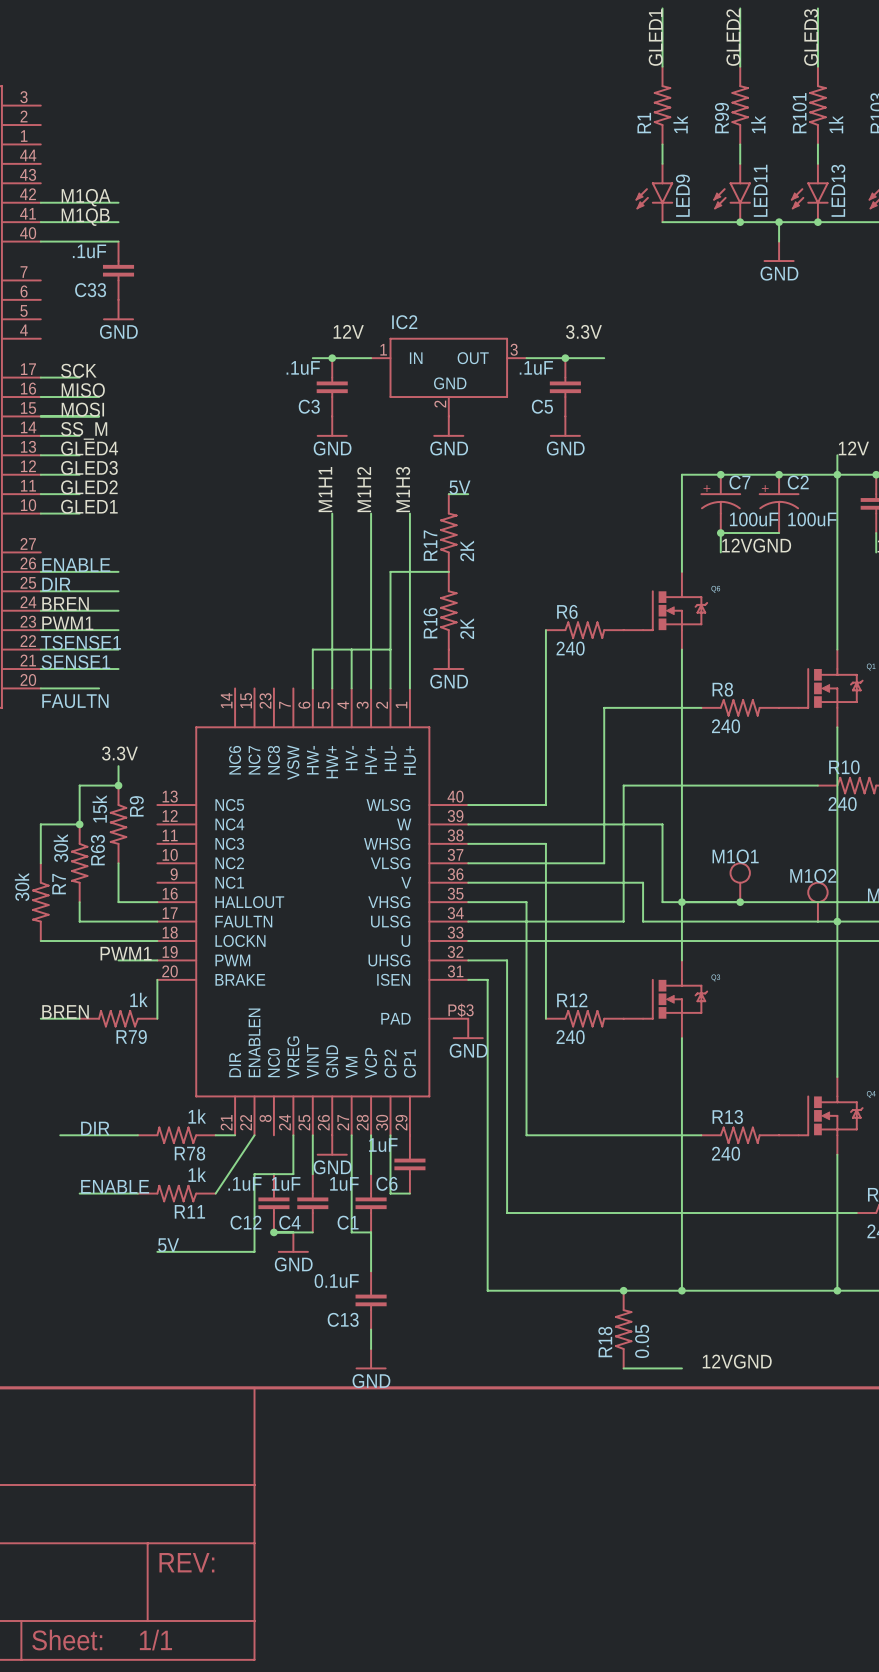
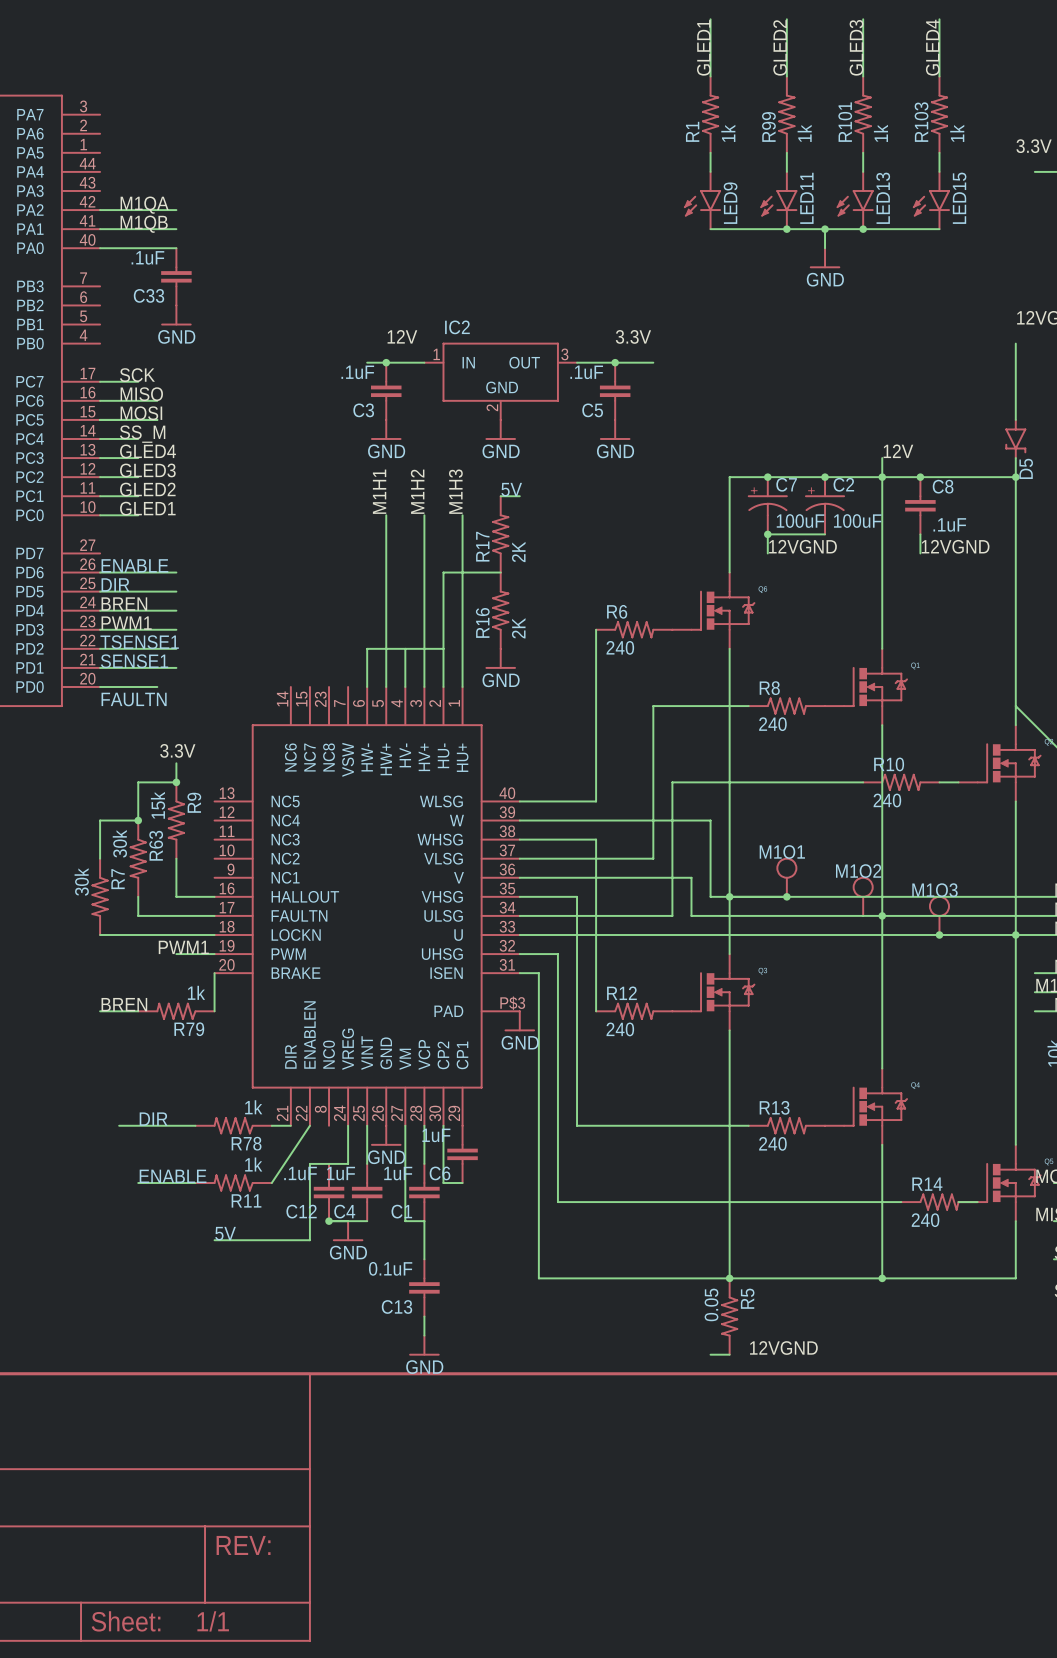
junction: (623, 1290) -> none
R18: 0.05 (623, 1329) -> none
R5: none -> 0.05 (729, 1316)
wire: (623, 1368) (662, 1368) -> none

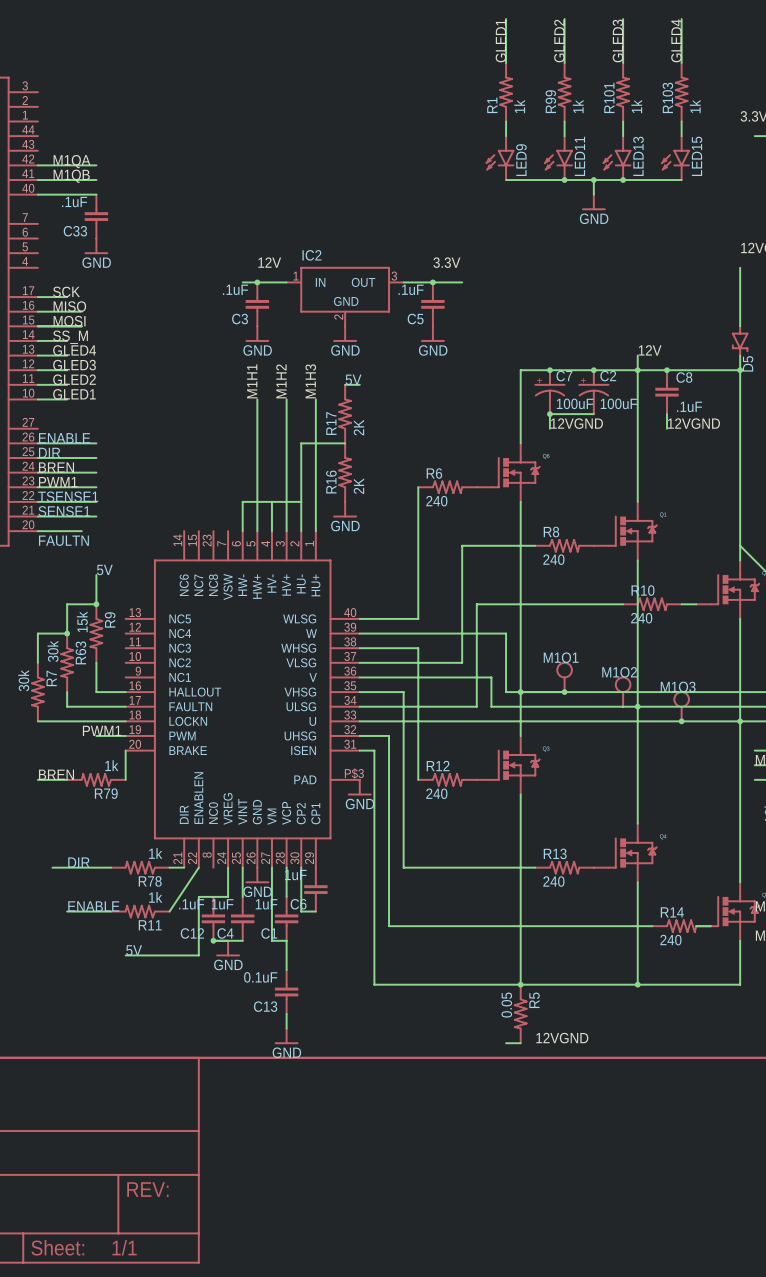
text: none -> 5V (104, 569)
wire: none -> (96, 575) (96, 589)
label: 3.3V (177, 750) -> none

